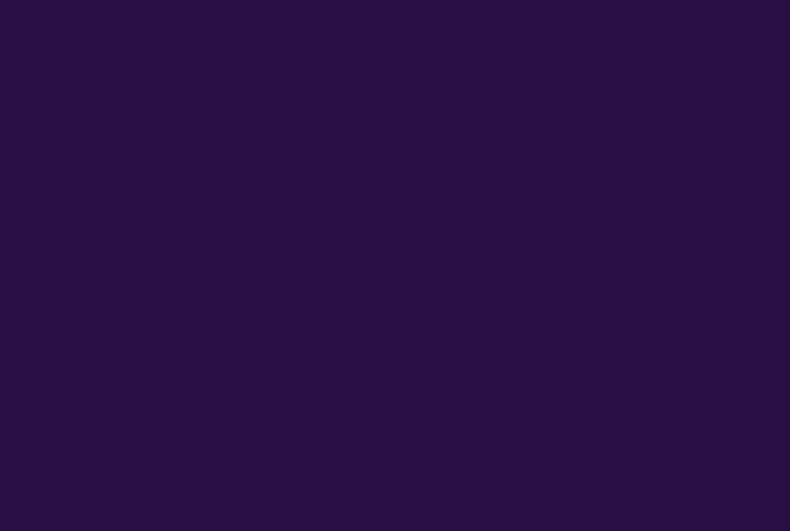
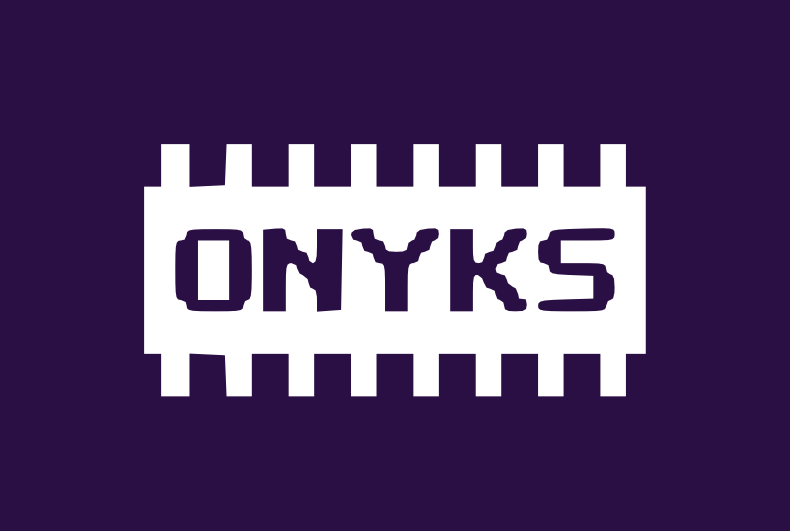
drawing: none -> [144, 144, 646, 397]

